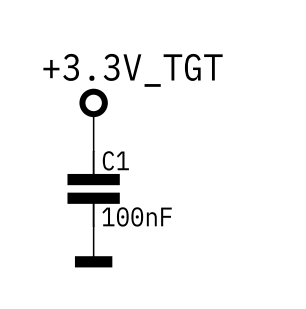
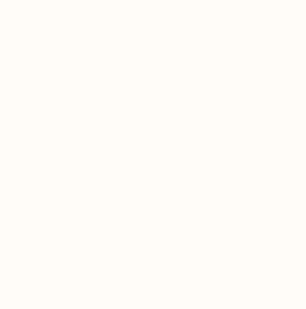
power symbol: +3.3V_TGT (93, 120) -> none
C1: 100nF (93, 188) -> none
power symbol: (93, 246) -> none

